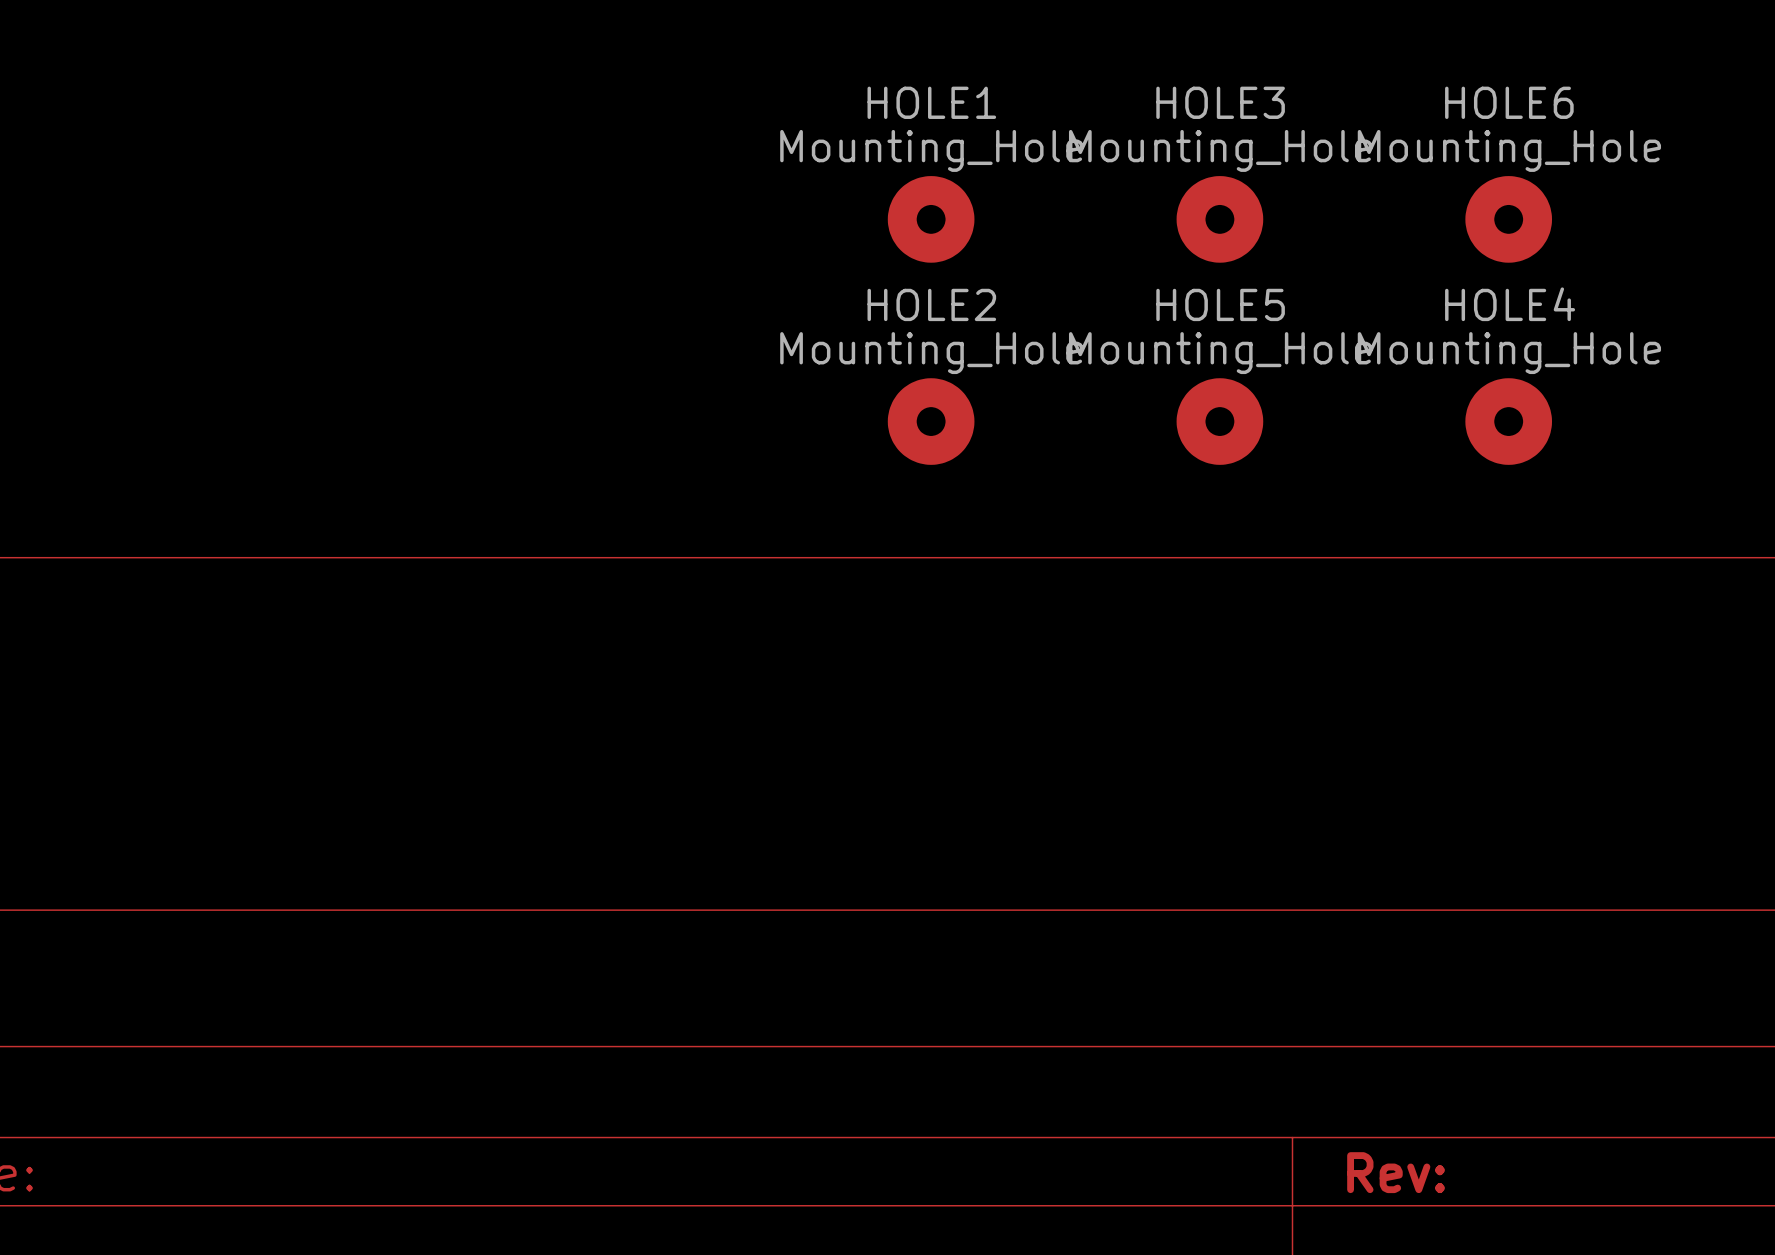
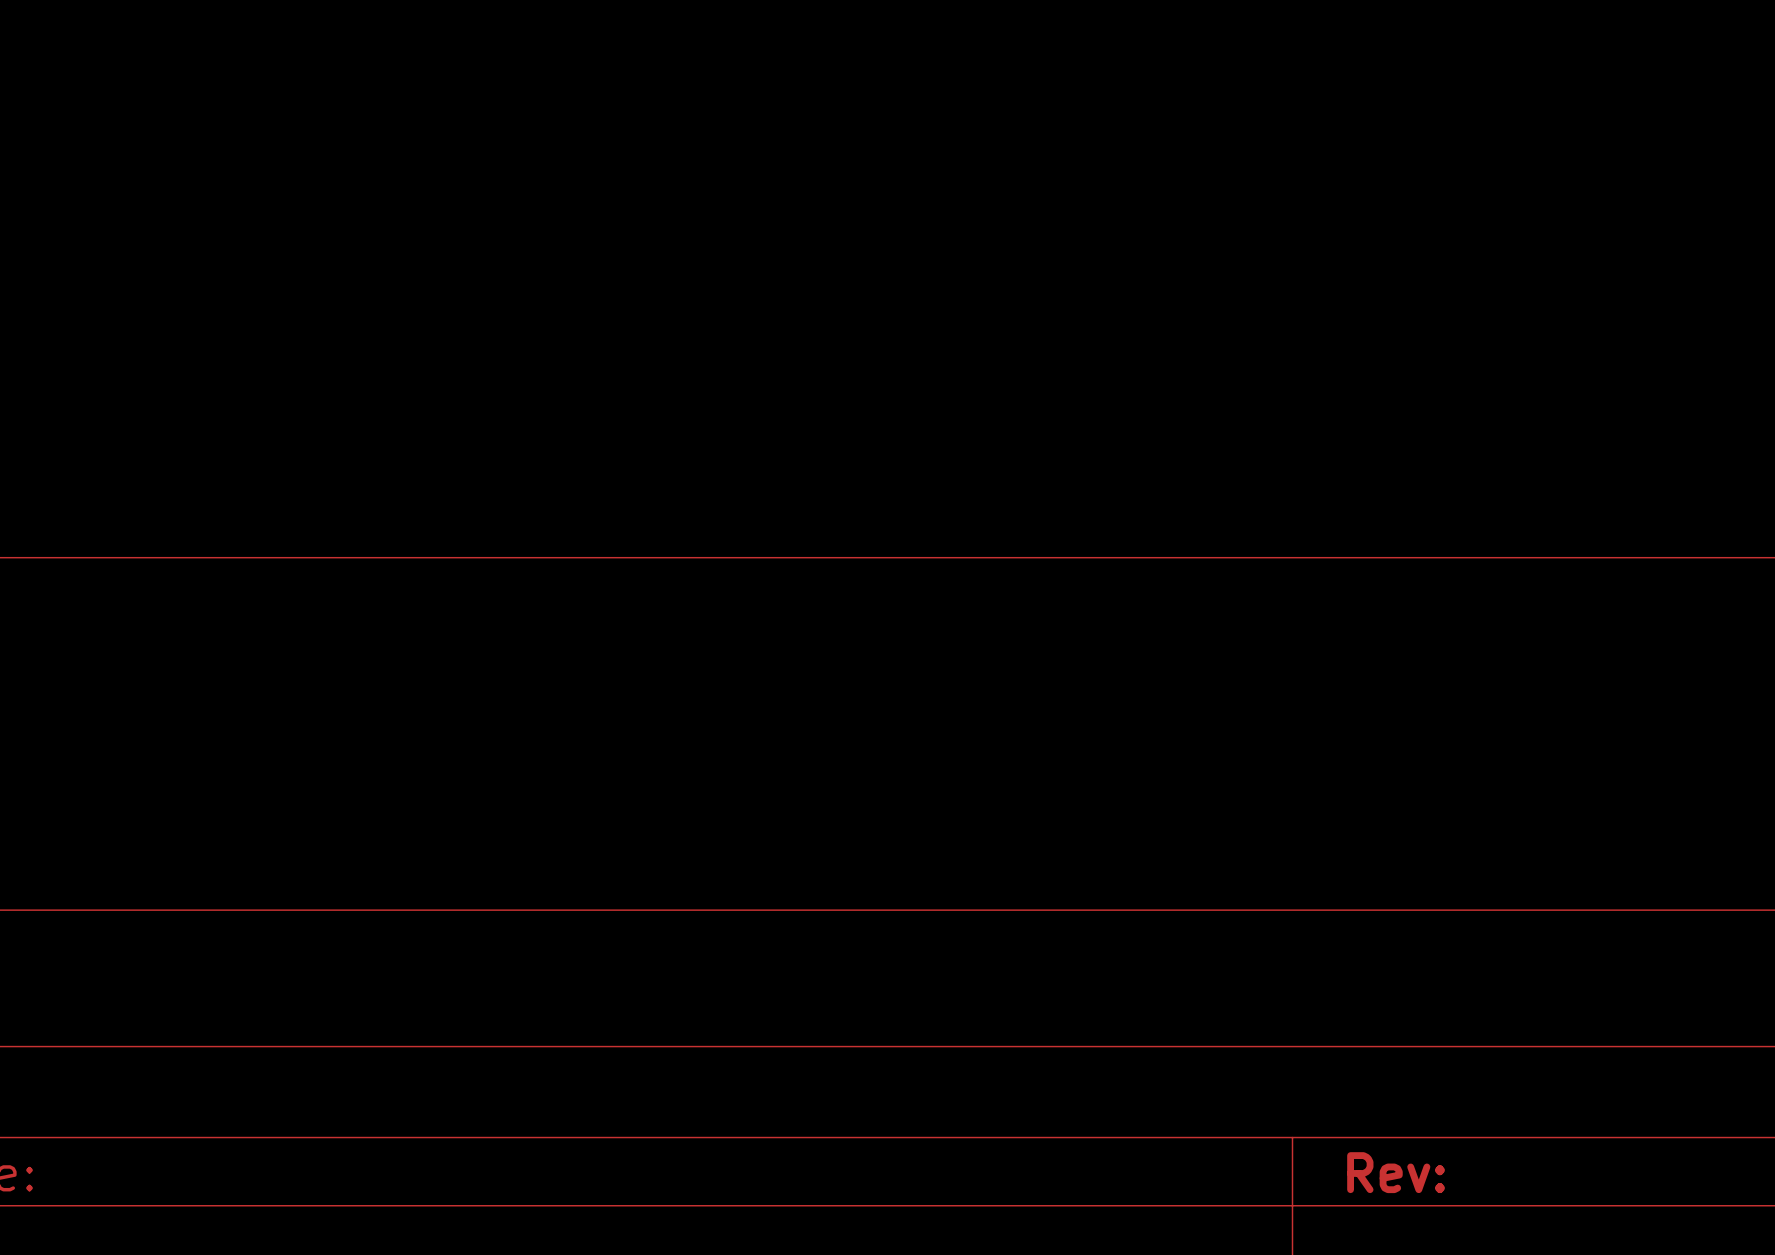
HOLE1: Mounting_Hole (931, 219) -> none
HOLE3: Mounting_Hole (1219, 219) -> none
HOLE6: Mounting_Hole (1508, 219) -> none
HOLE2: Mounting_Hole (931, 421) -> none
HOLE5: Mounting_Hole (1219, 421) -> none
HOLE4: Mounting_Hole (1508, 421) -> none

